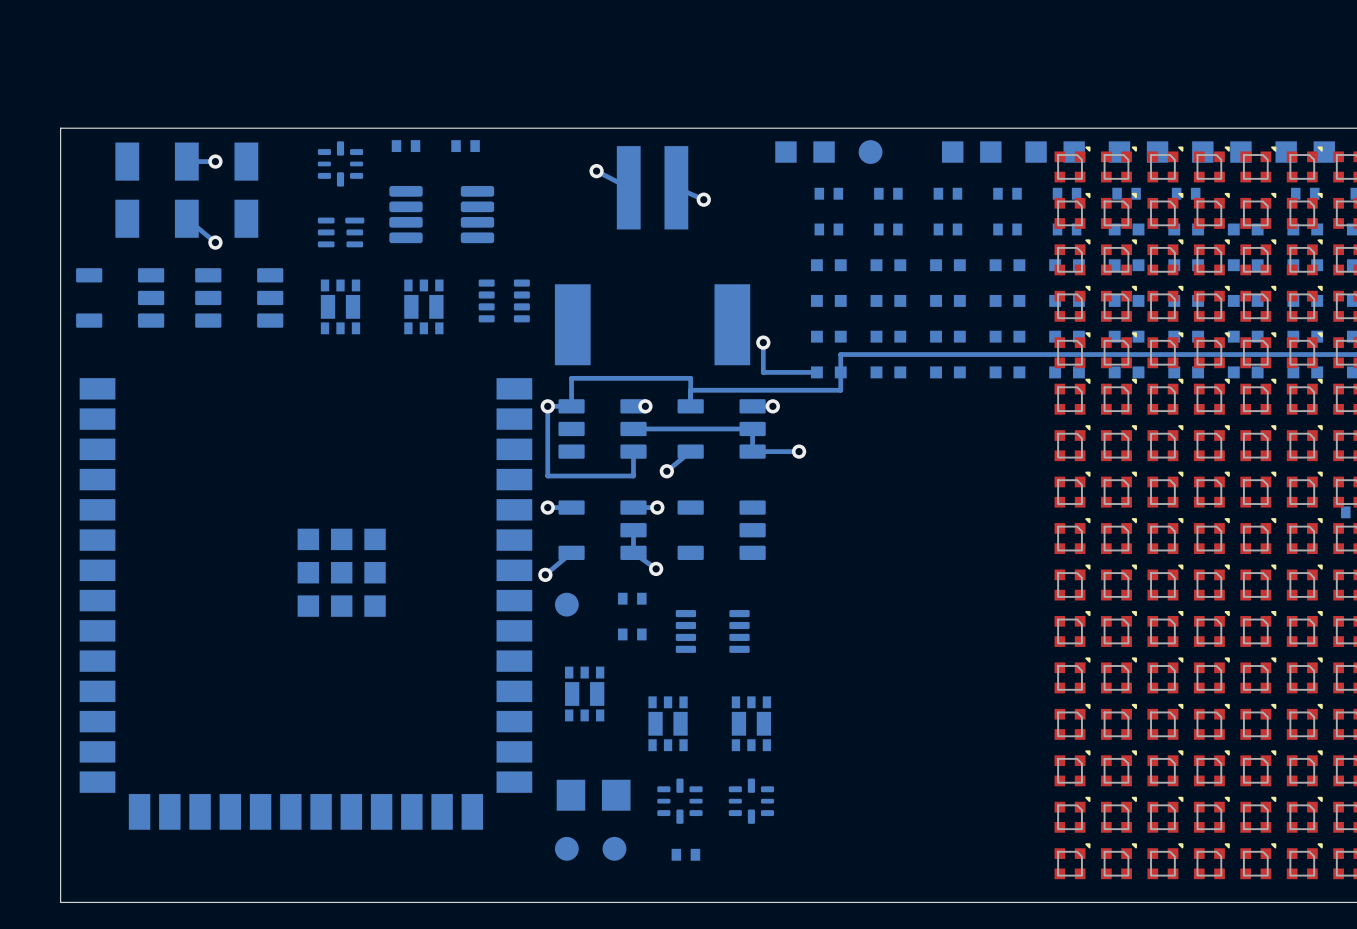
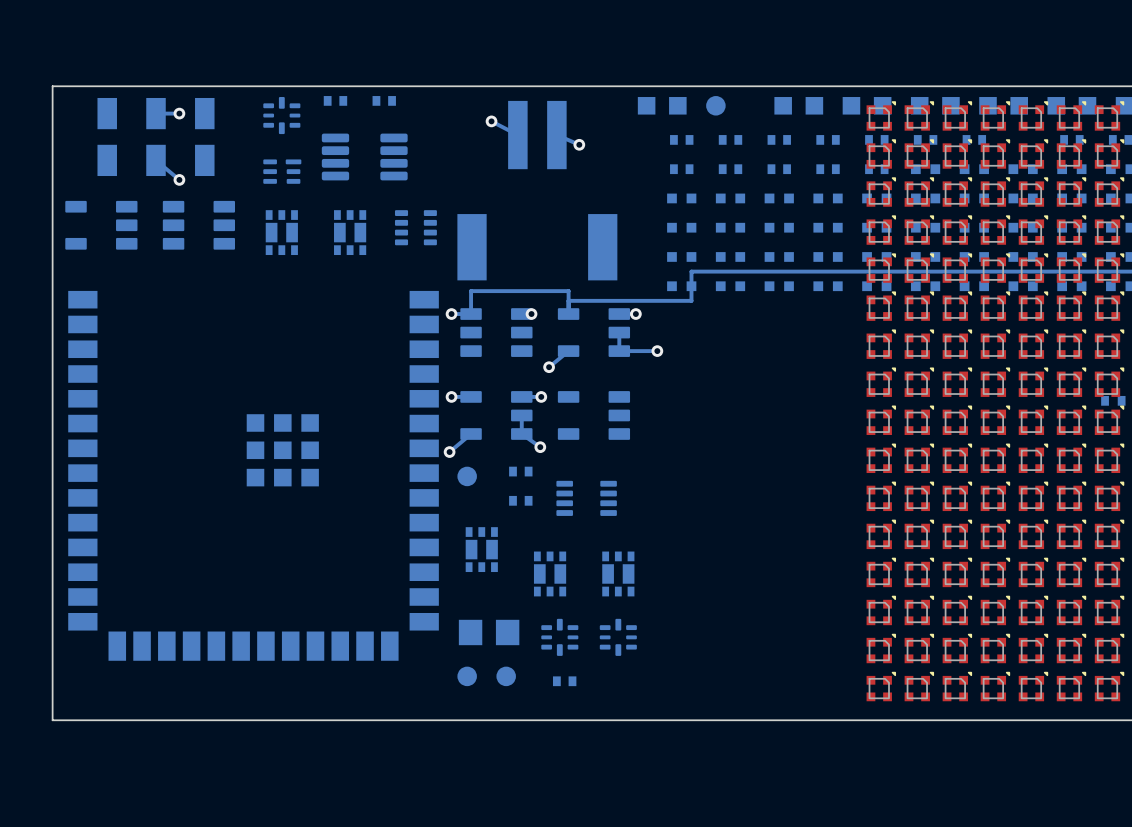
bottom track: (763, 342) (763, 372) (816, 372) -> none
via: (763, 342) -> none
bottom track: (547, 406) (547, 476) (633, 476) (633, 451) -> none
bottom track: (633, 428) (752, 428) -> none

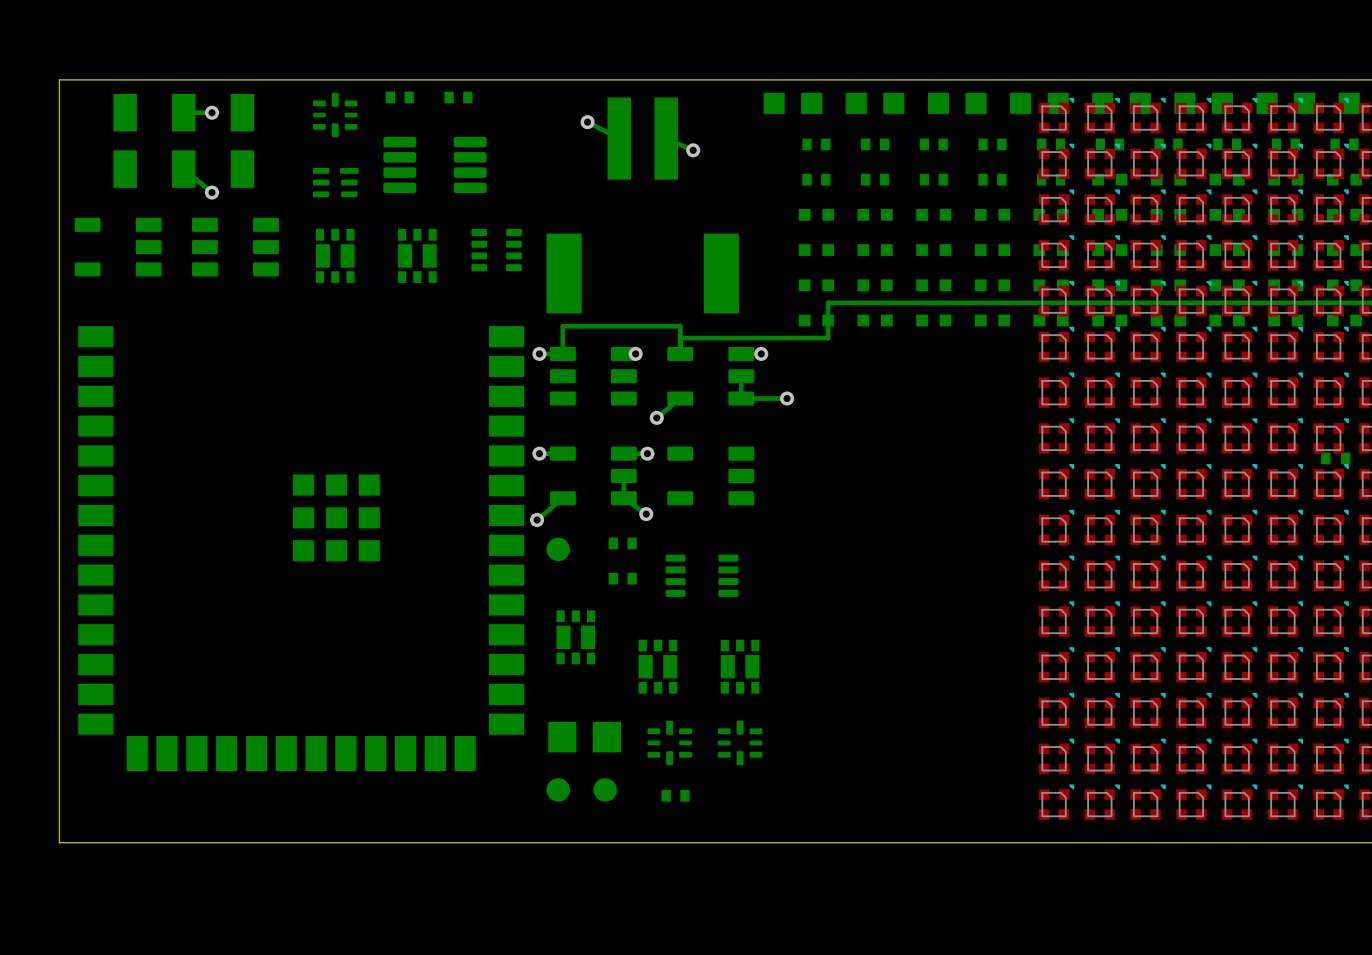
part footprint: [706, 96, 726, 116] -> [845, 92, 905, 114]
part: none -> (1227, 144)

